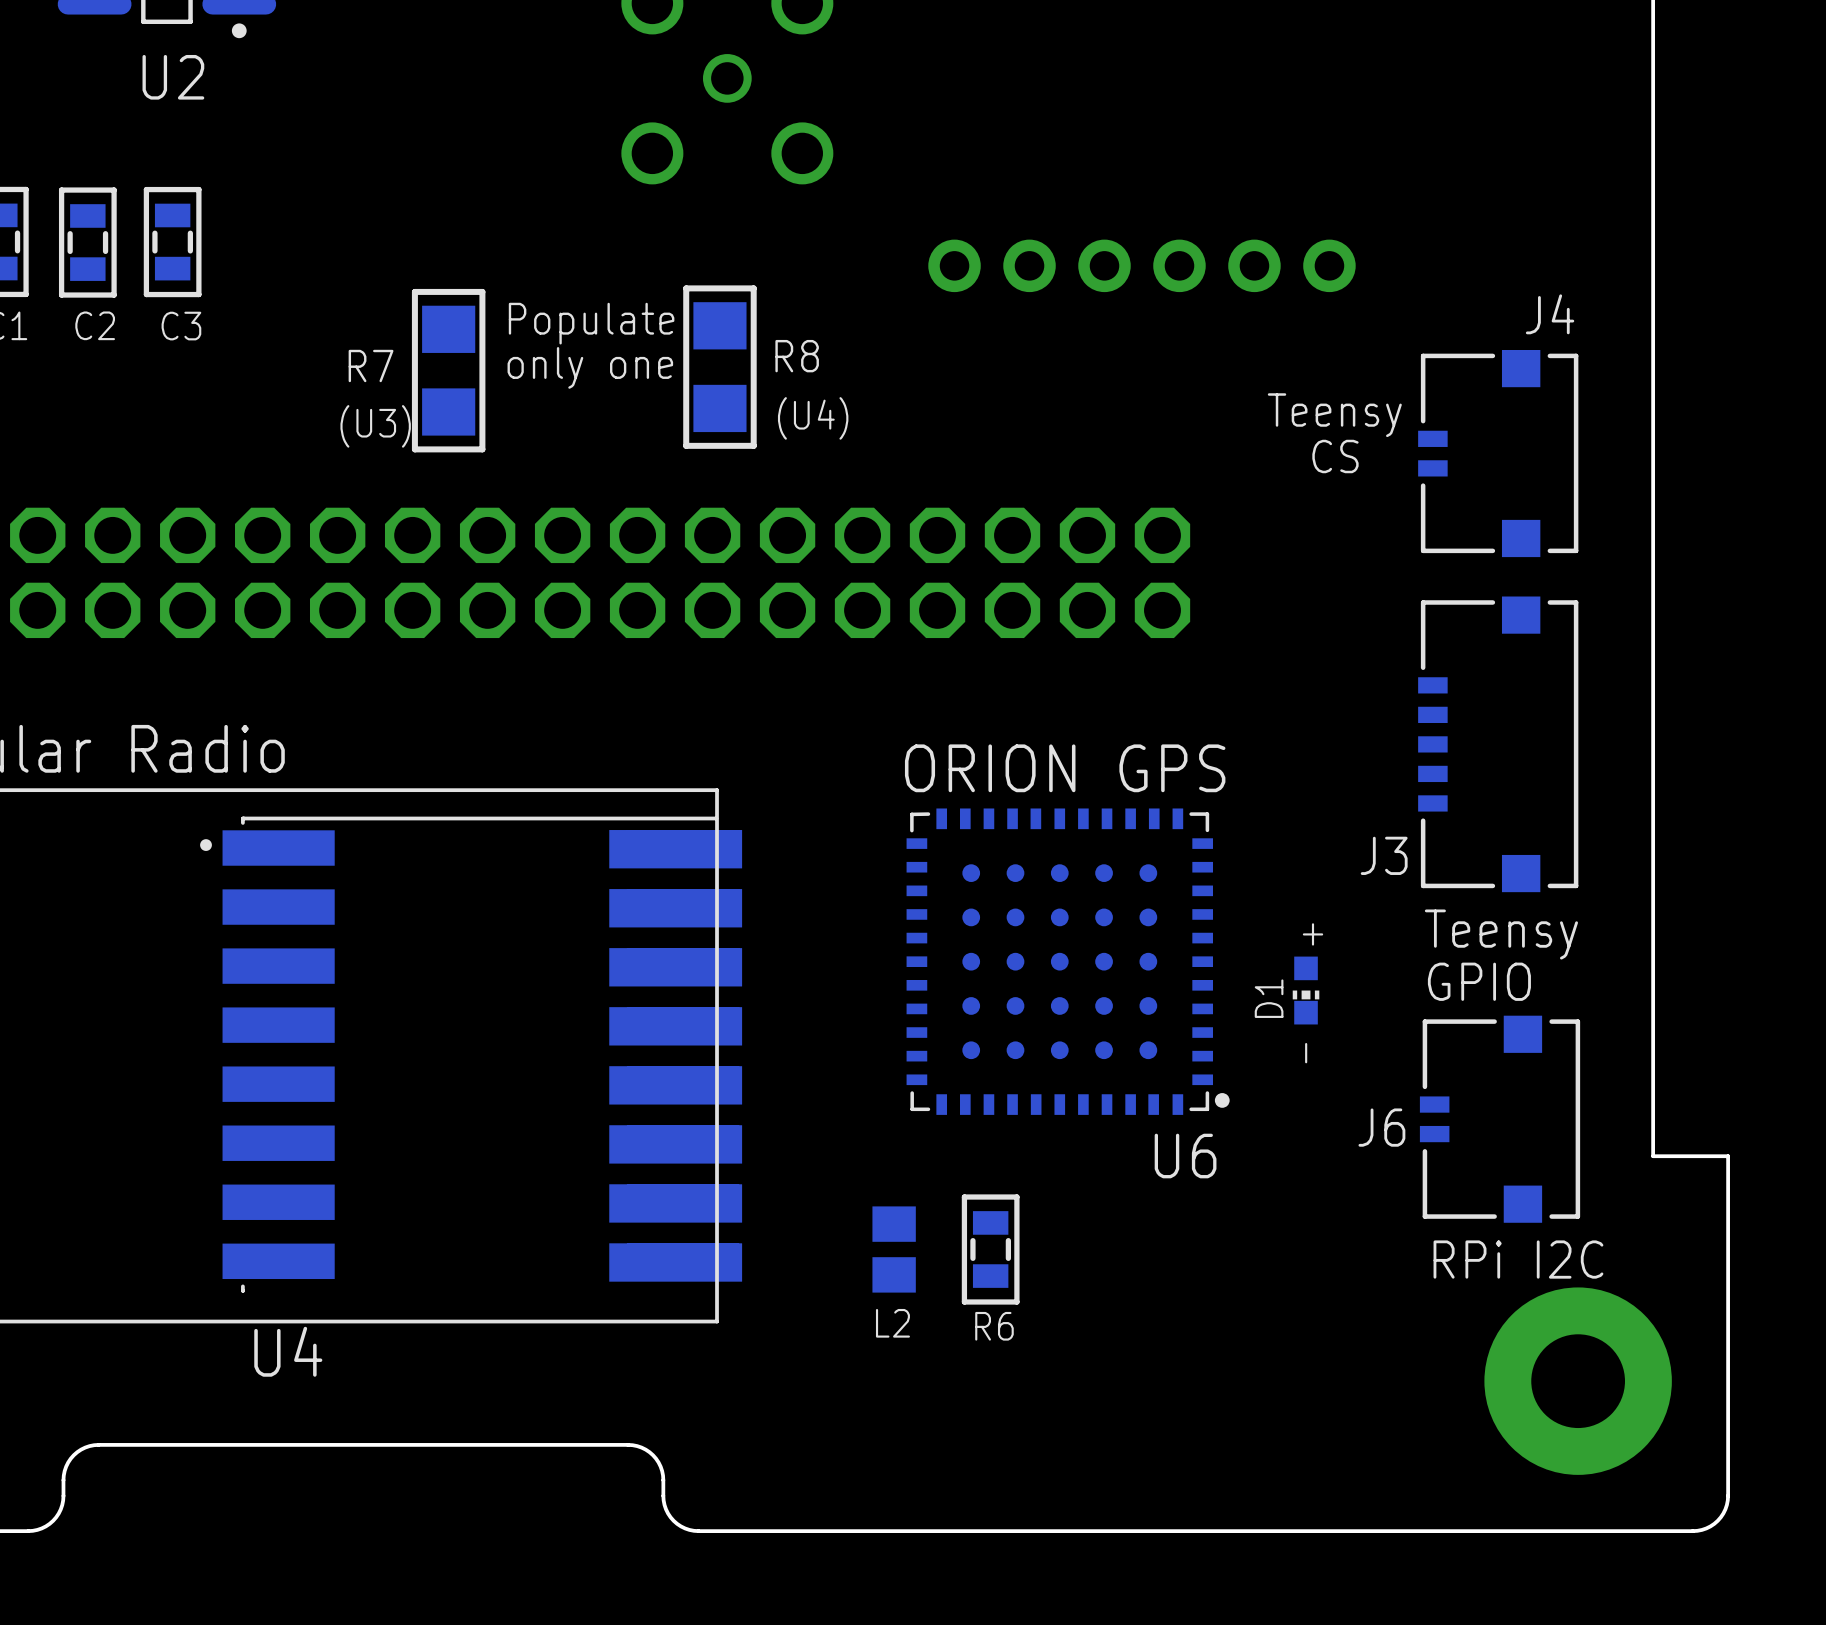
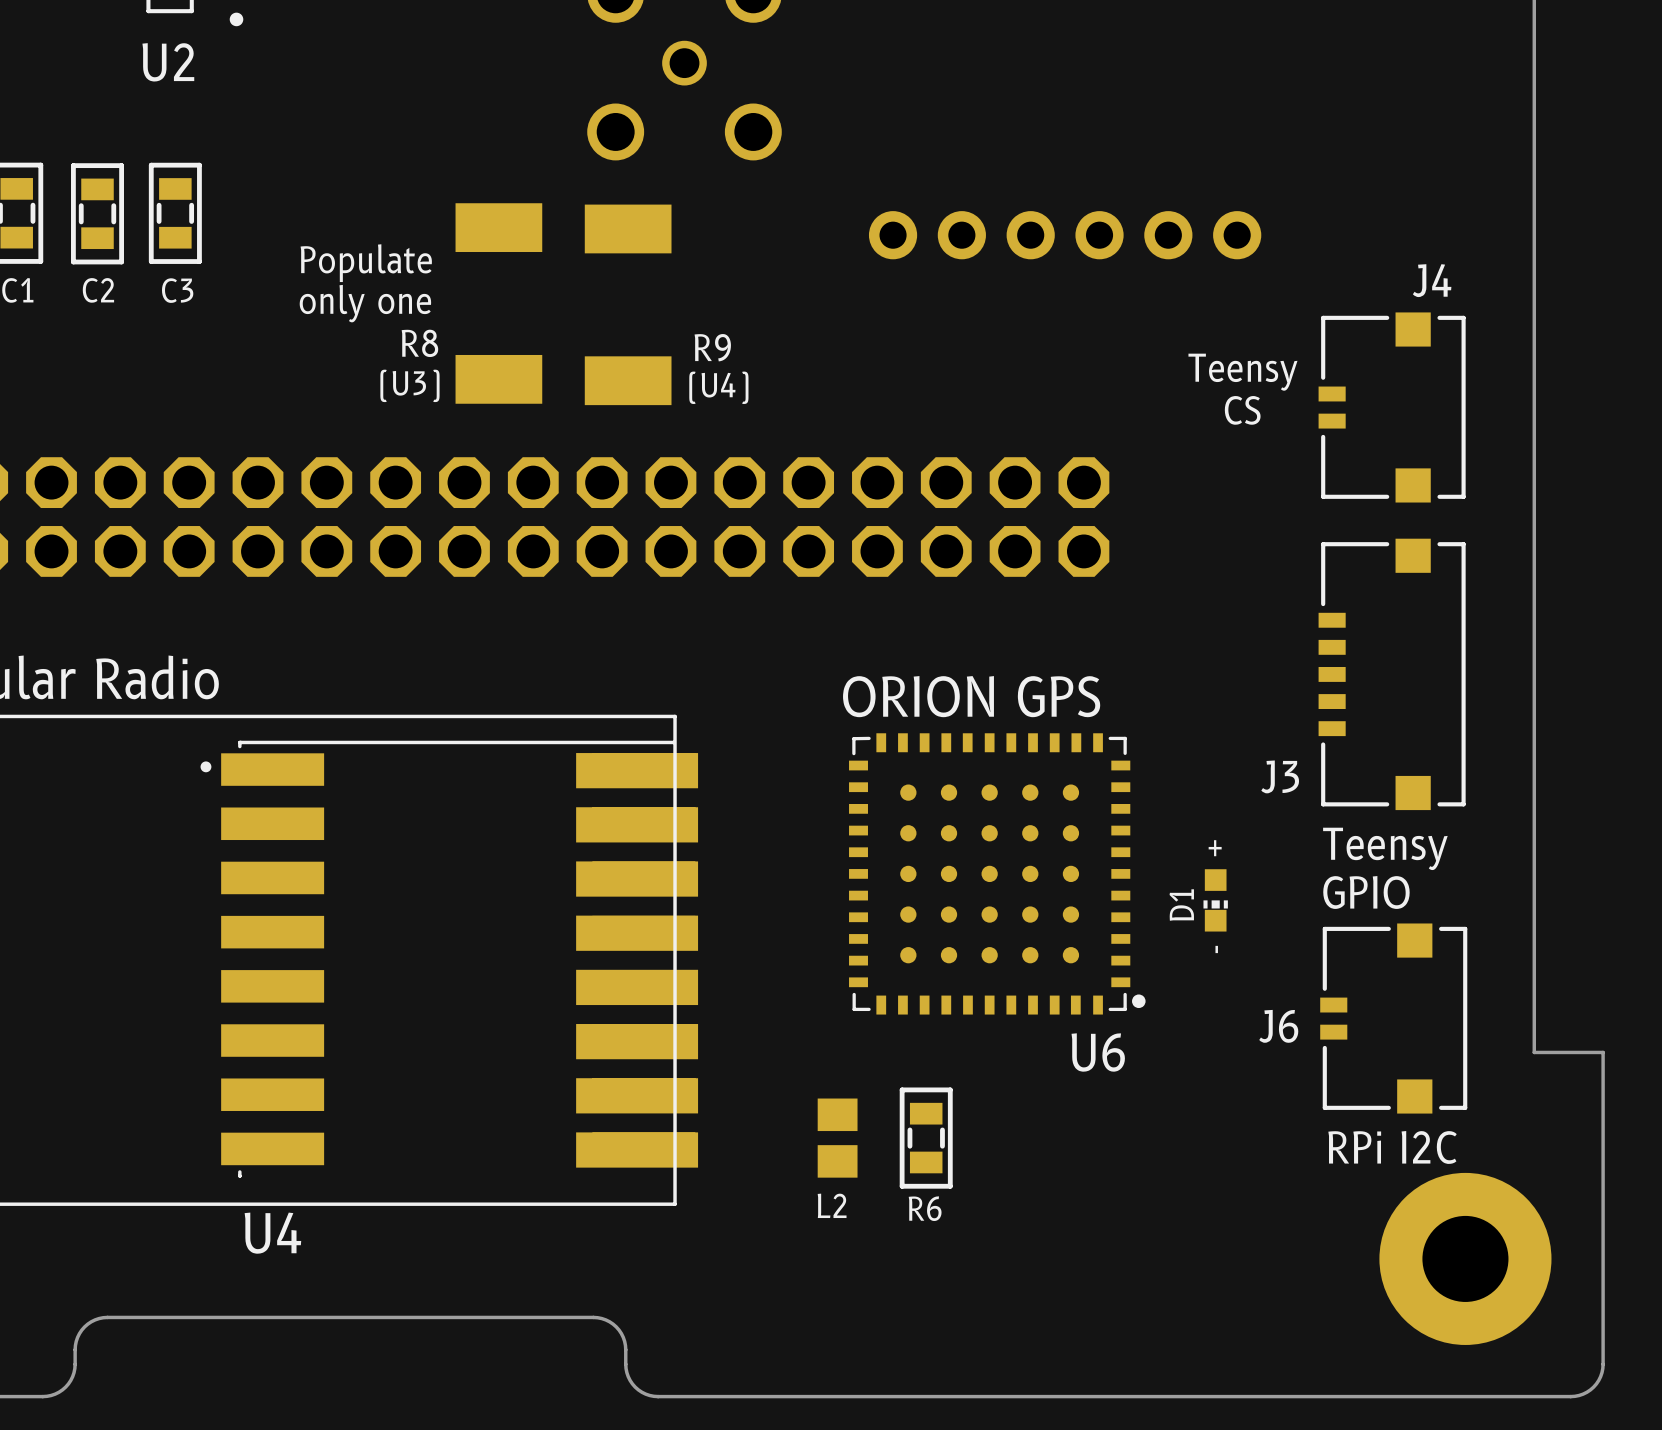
R8 footprint: [683, 285, 757, 449] -> [455, 203, 543, 404]
text position: Populate (591, 323) -> Populate (366, 263)
R9: none -> (628, 304)
R8 name position: R8 (797, 356) -> R8 (419, 343)
text position: only one (590, 367) -> only one (365, 303)
R7: (448, 370) -> none
text position: (U4) (813, 418) -> (U4) (718, 387)
text position: (U3) (375, 426) -> (U3) (409, 385)

